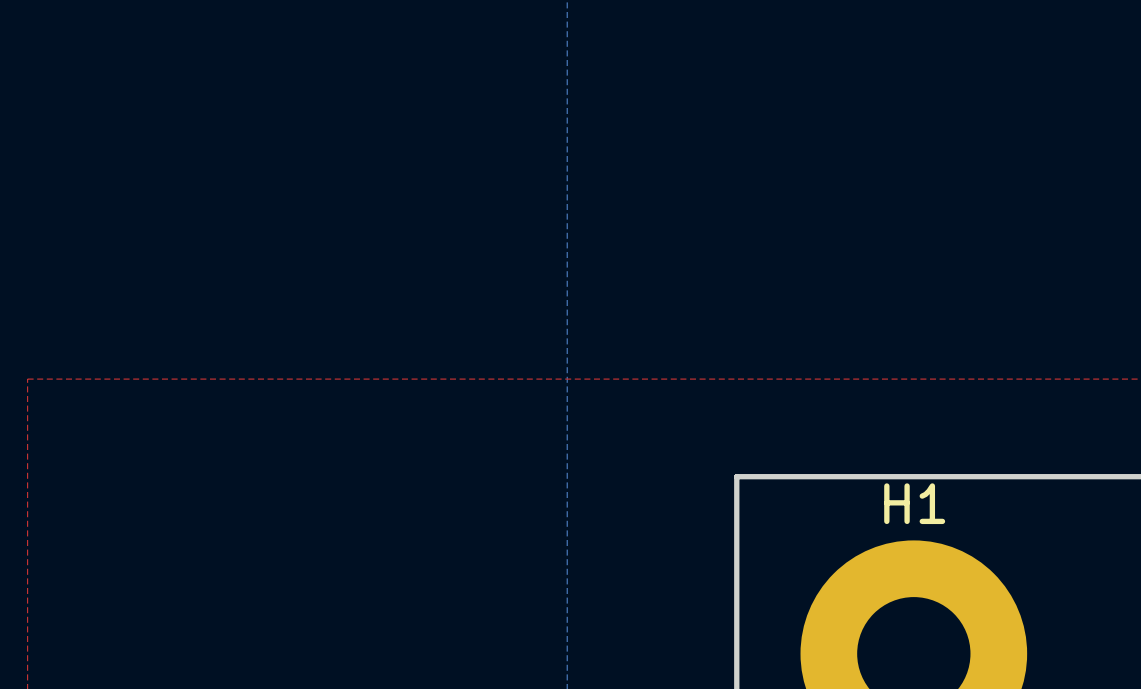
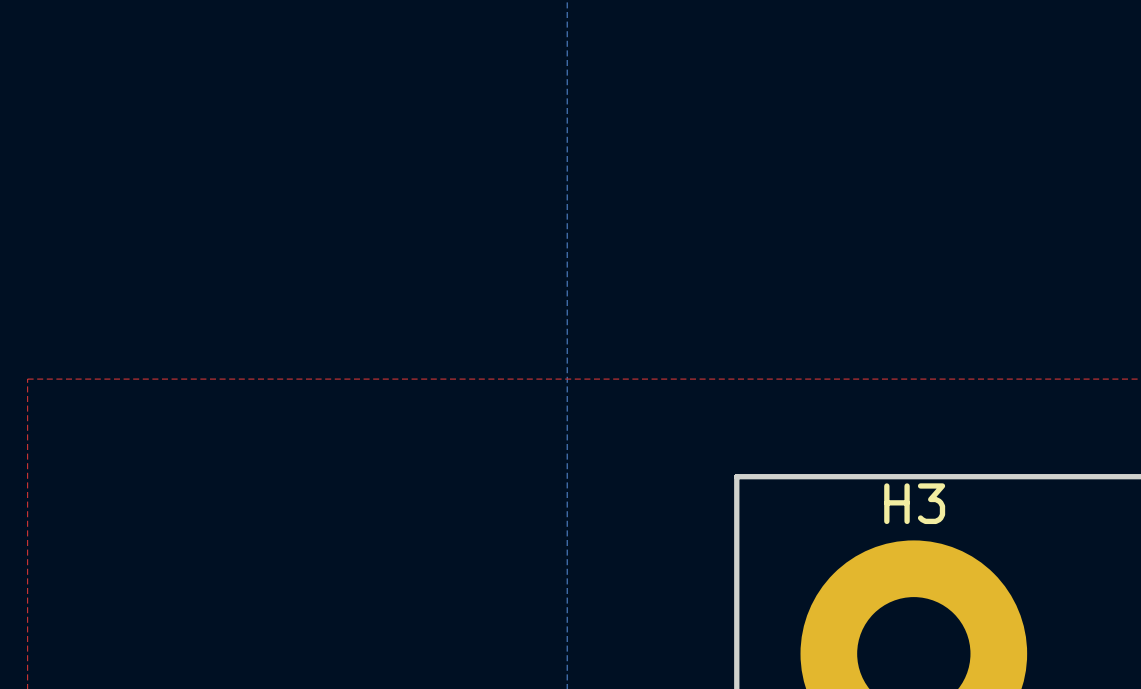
H1 name: H1 (914, 503) -> H3 (914, 503)

